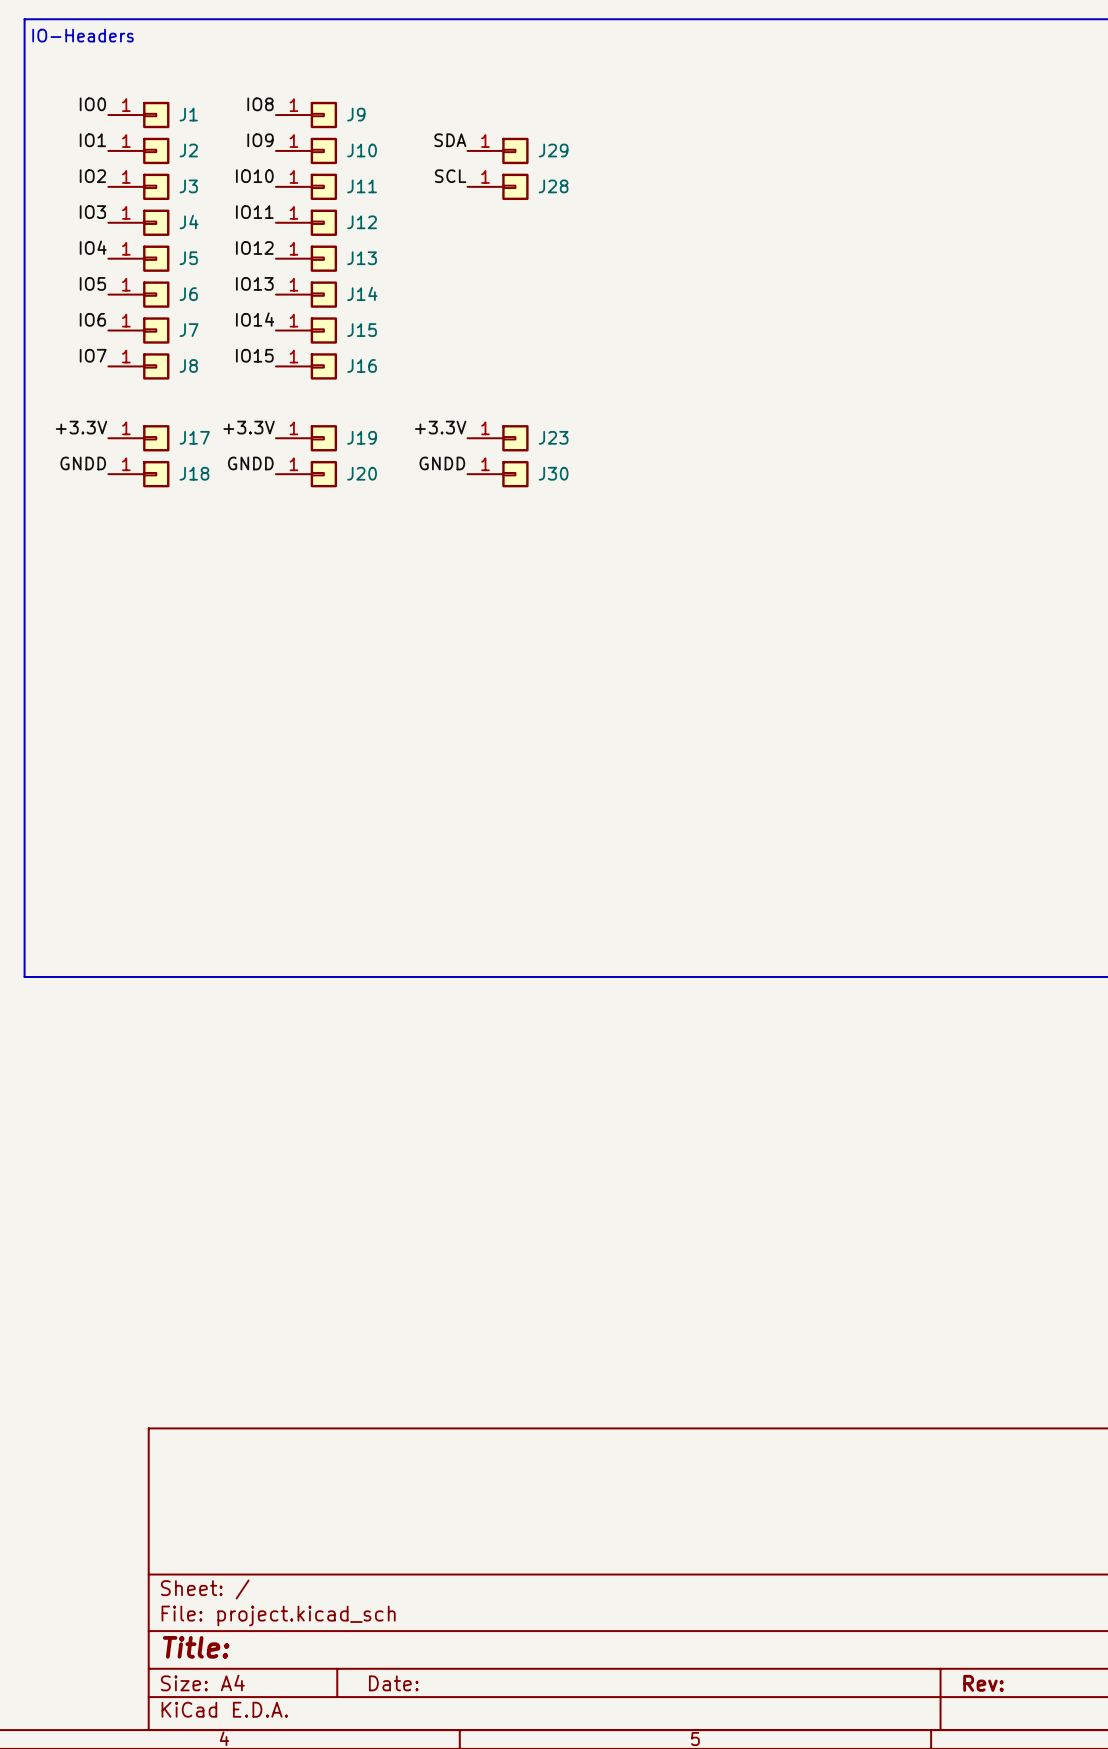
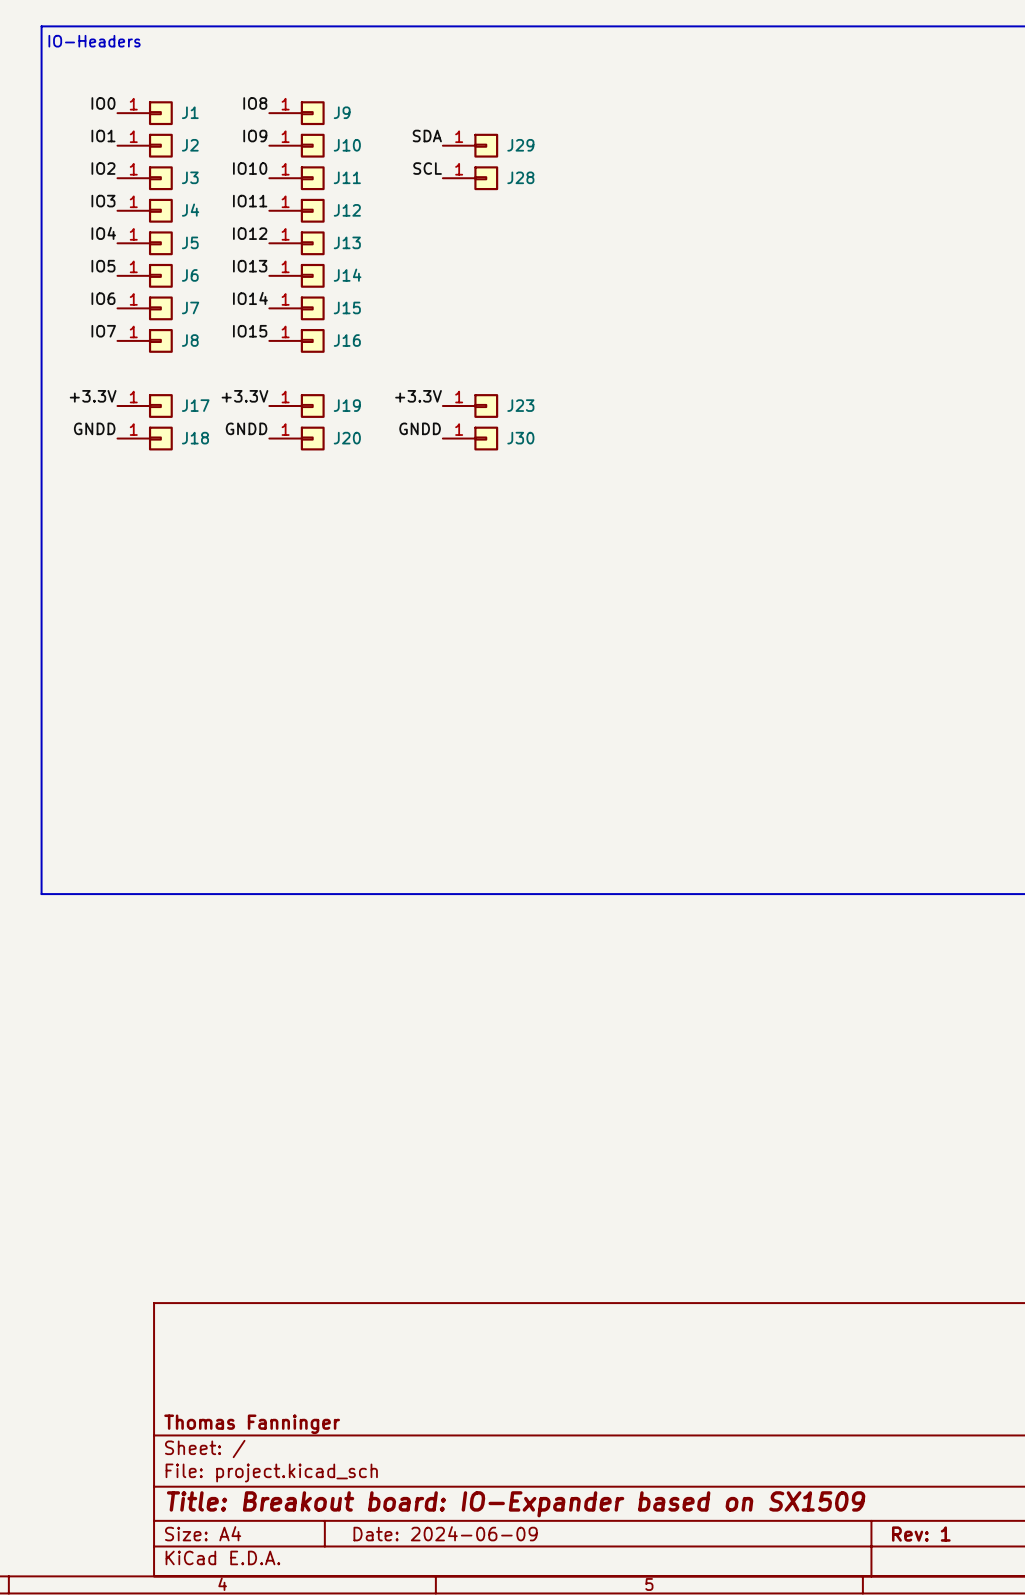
title block: none -> Thomas Fanninger (252, 1424)
title block: Title: (196, 1647) -> Title: Breakout board: IO-Expander based on SX1509 (516, 1504)
title block: Date: (393, 1683) -> Date: 2024-06-09 (445, 1533)
title block: Rev: (983, 1683) -> Rev: 1 (921, 1534)

